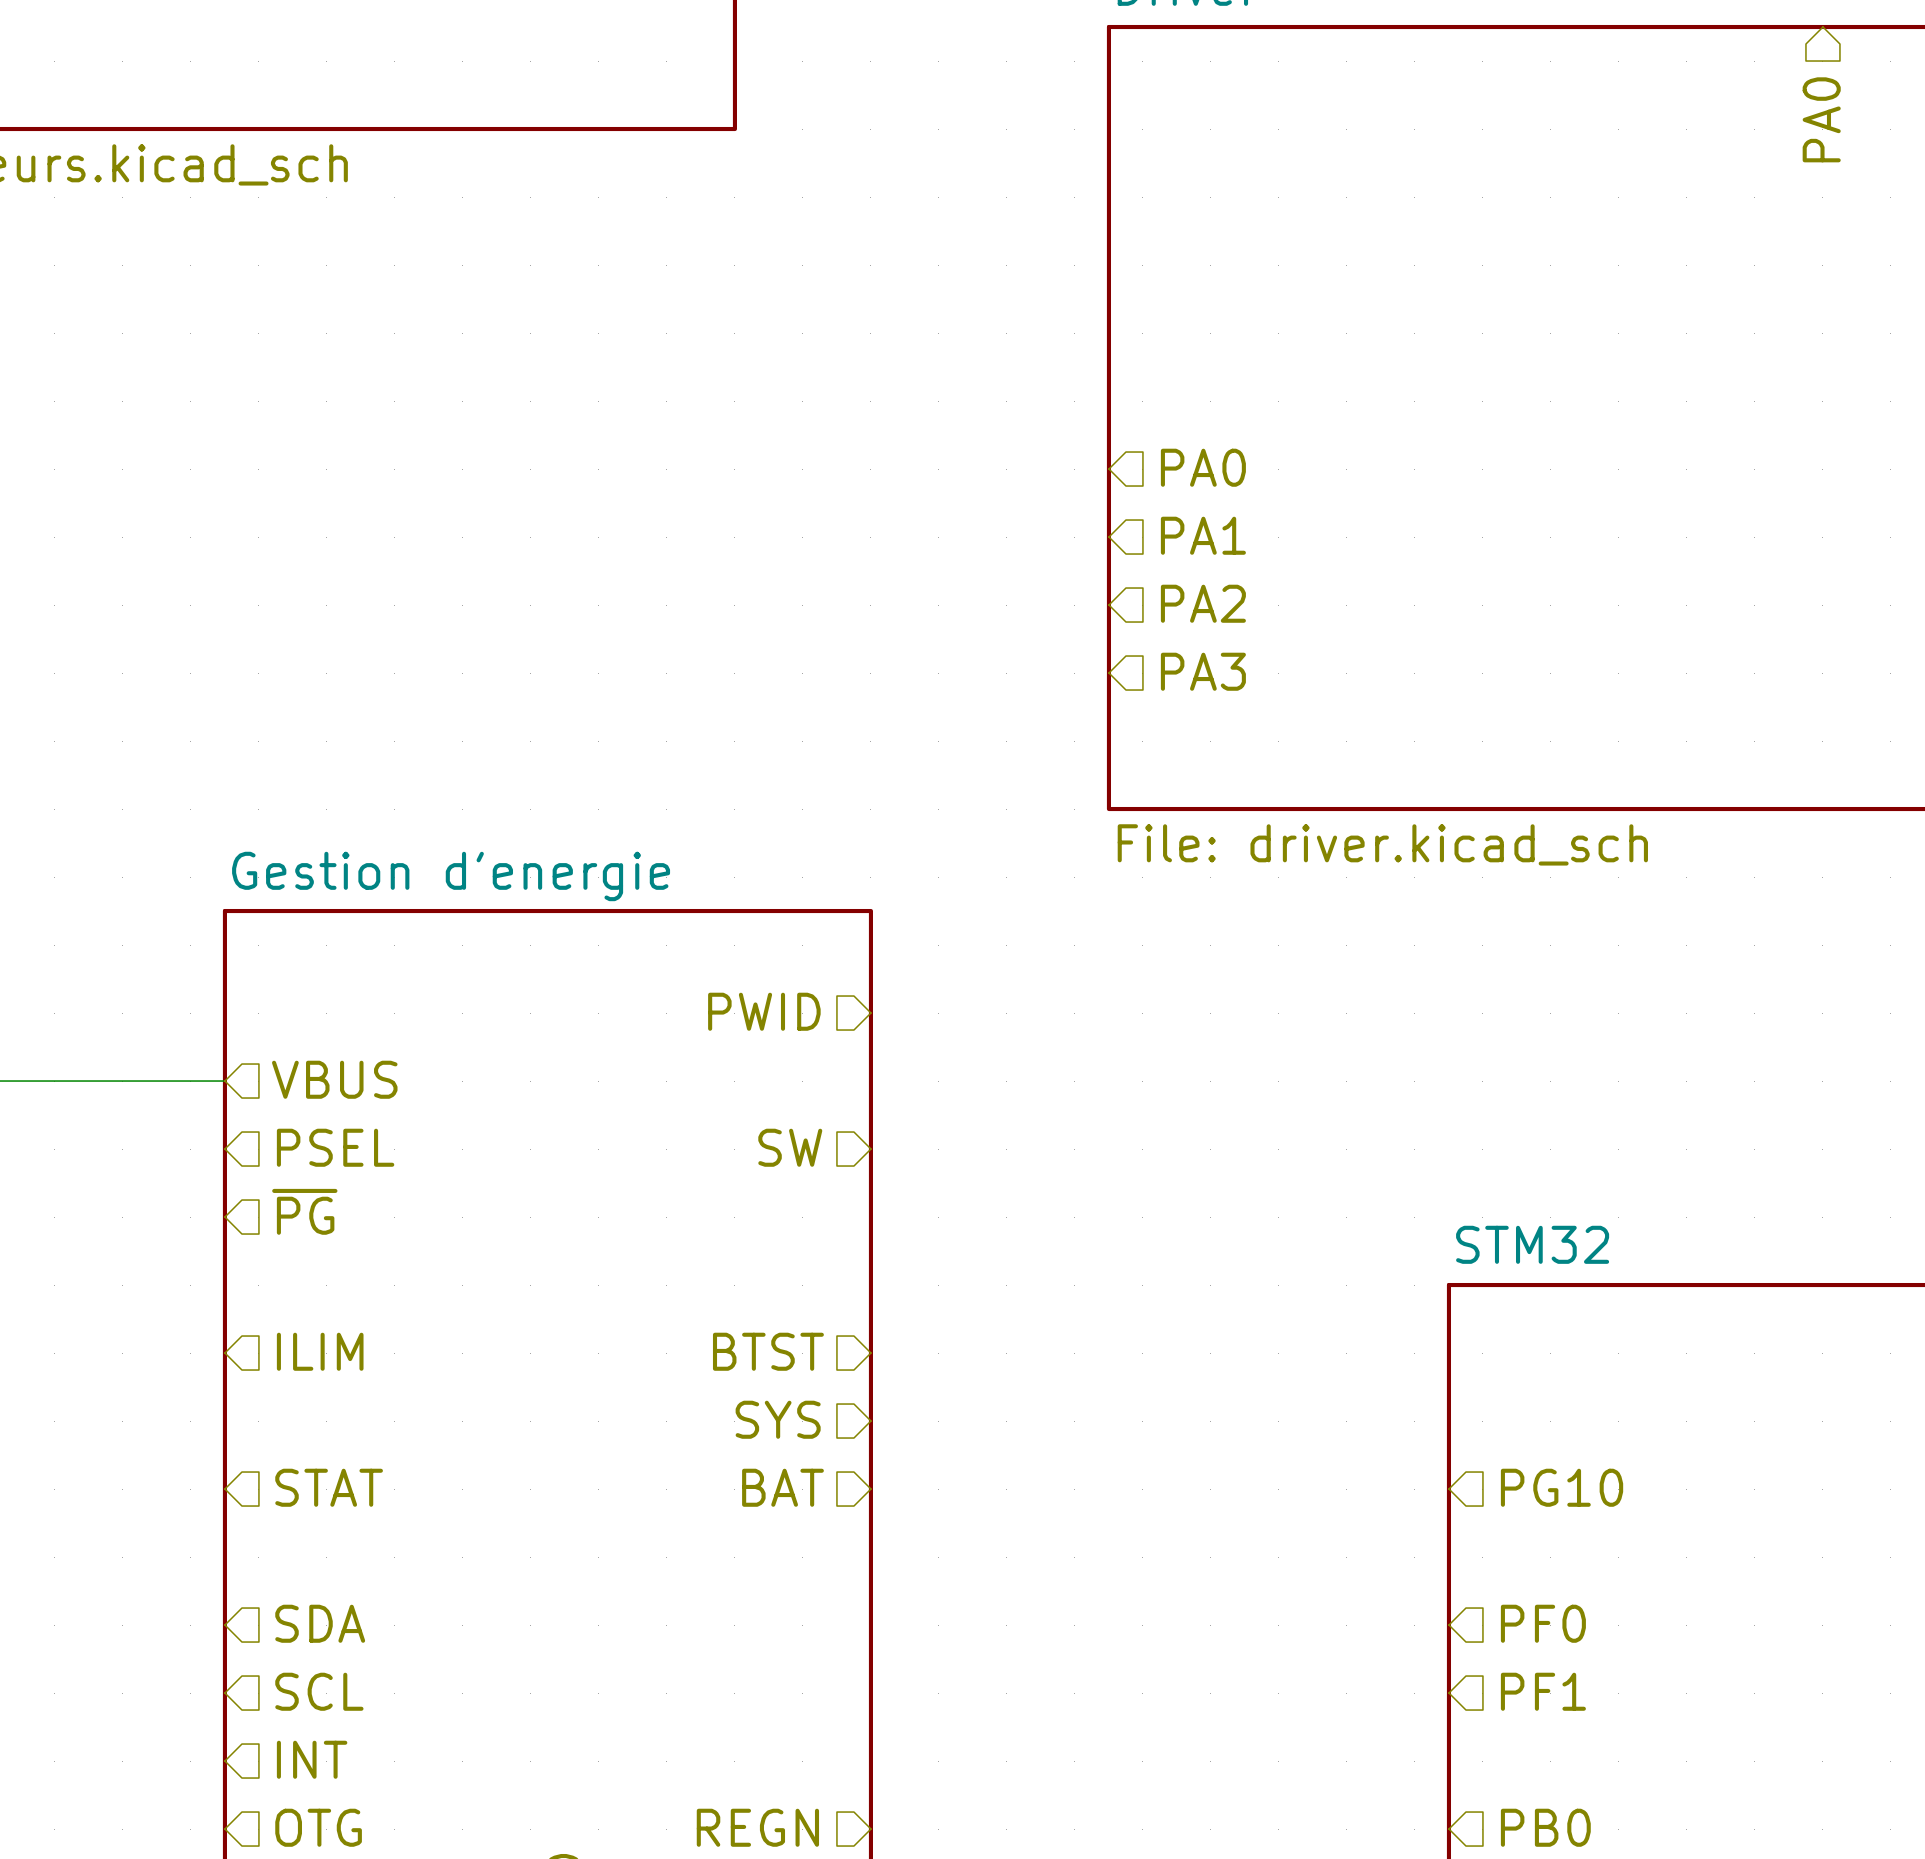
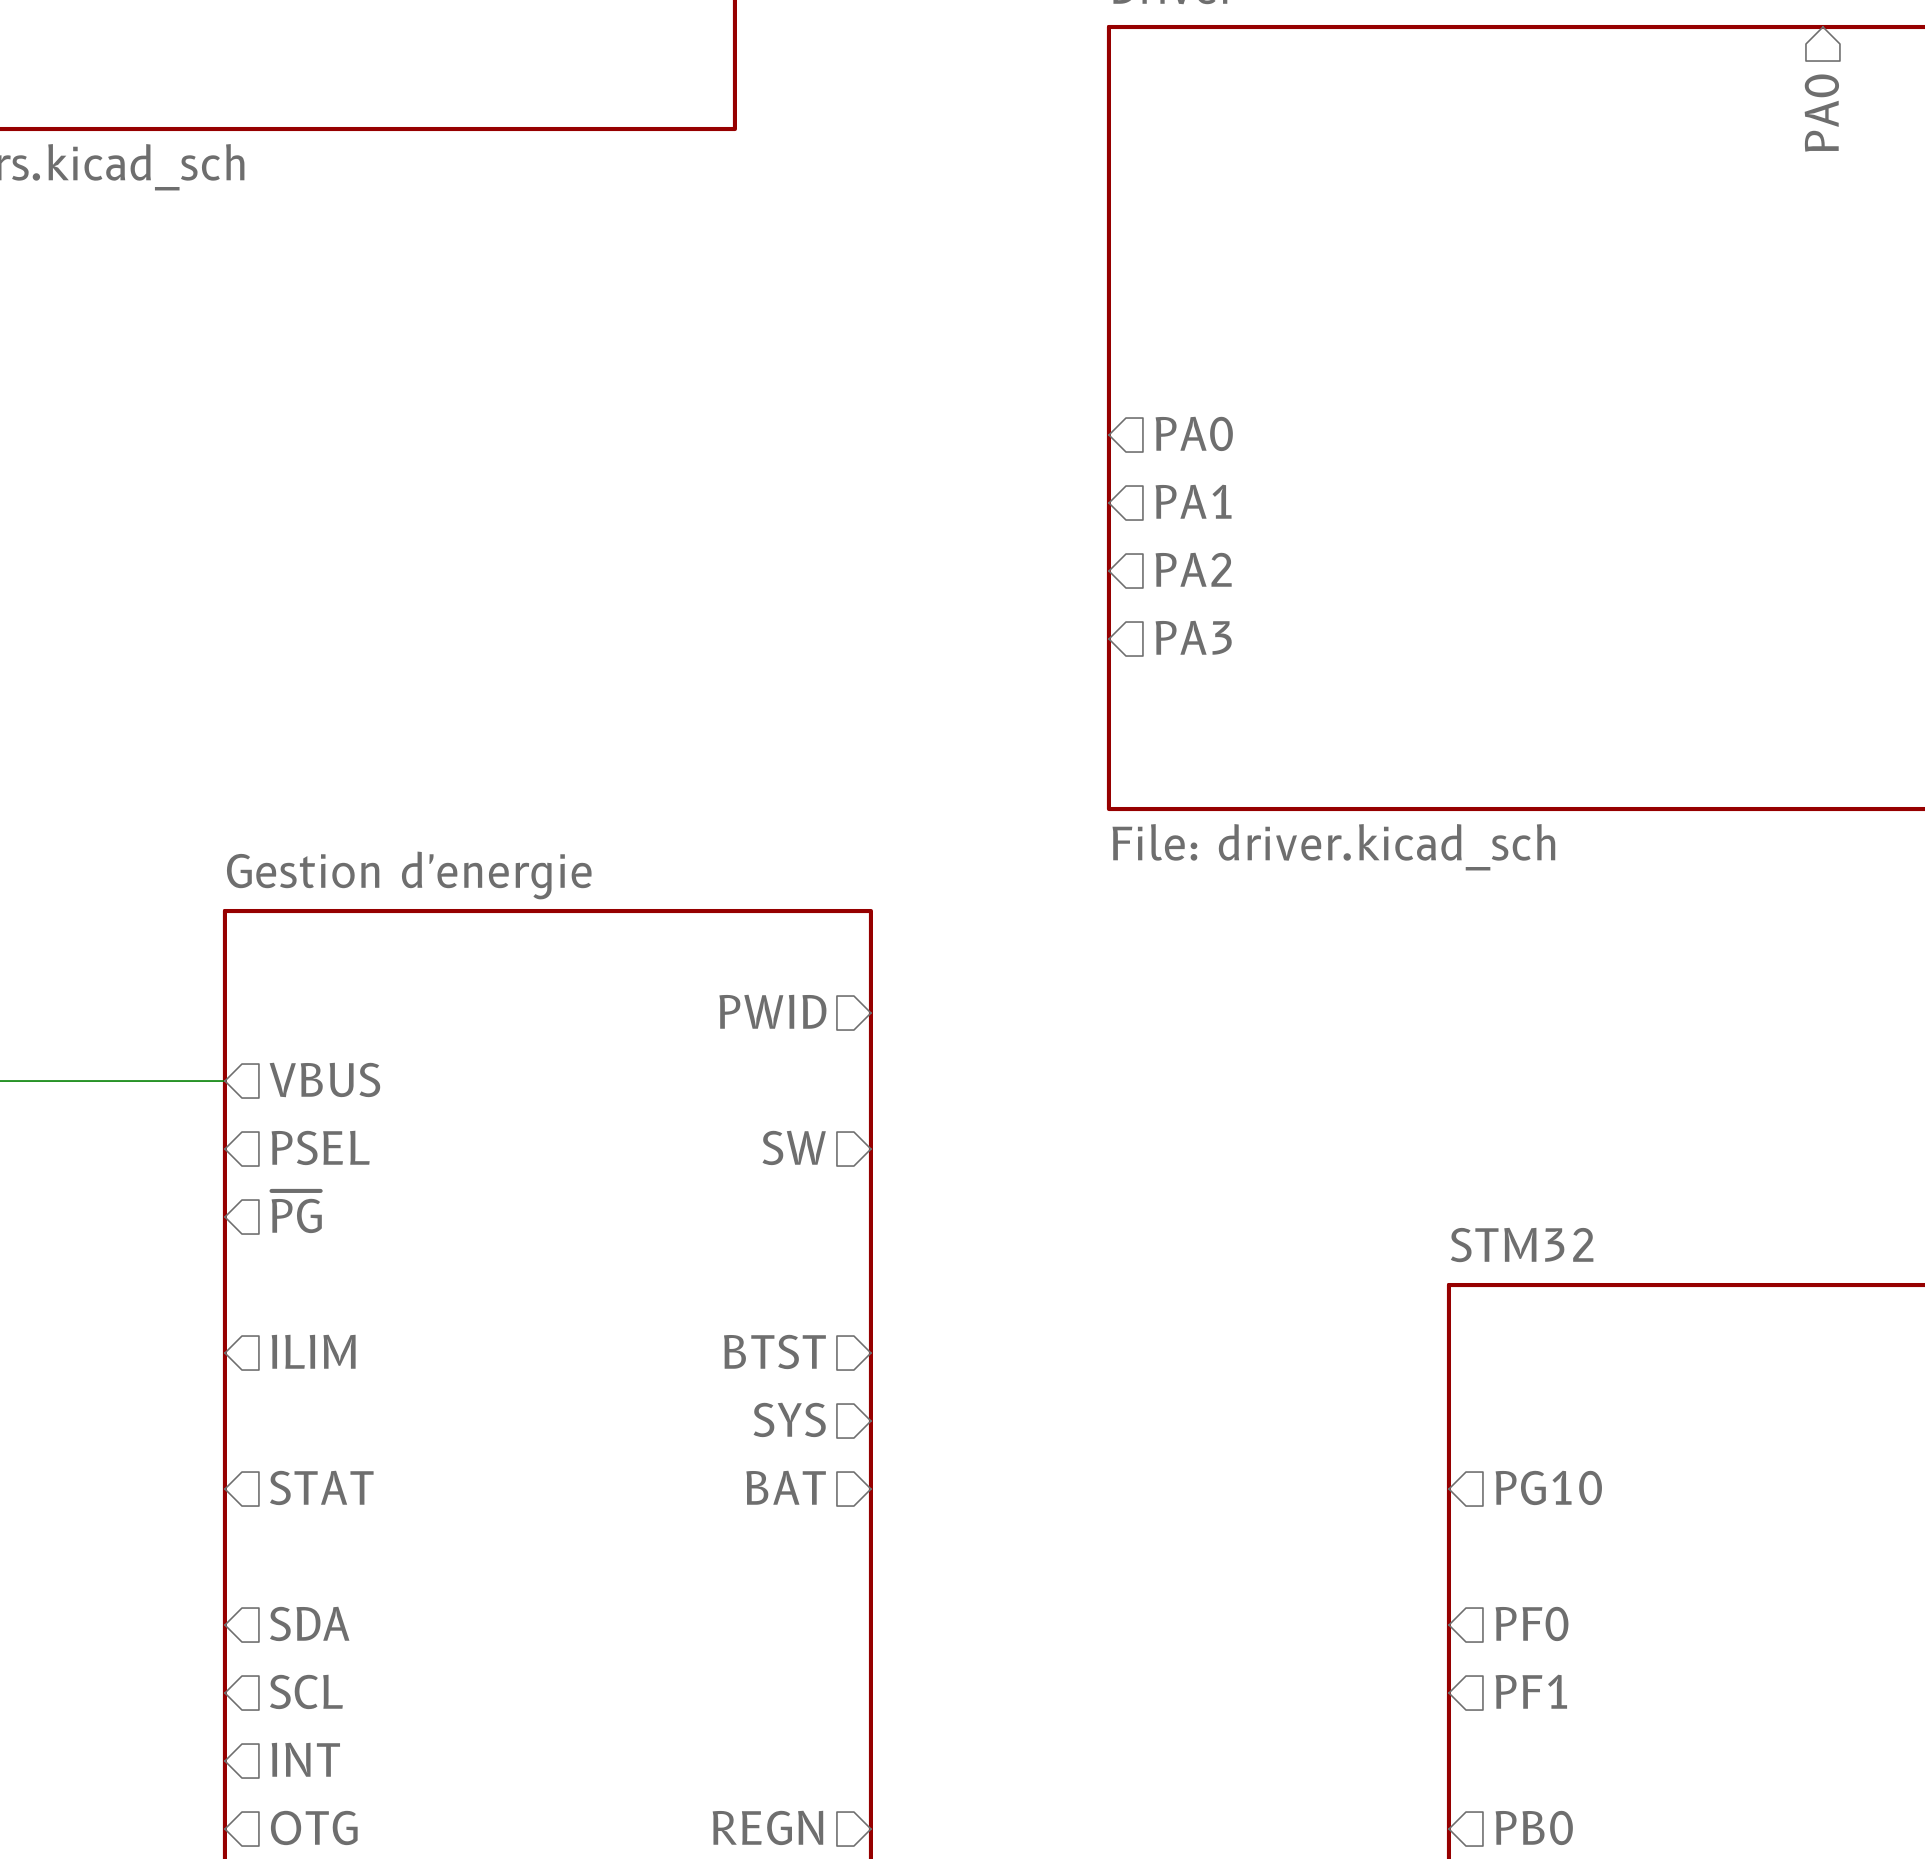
hierarchical label position: PA0 (1203, 467) -> PA0 (1194, 433)
hierarchical label position: PA1 (1203, 535) -> PA1 (1193, 501)
hierarchical label position: PA2 (1203, 603) -> PA2 (1193, 569)
hierarchical label position: PA3 (1203, 671) -> PA3 (1193, 637)

